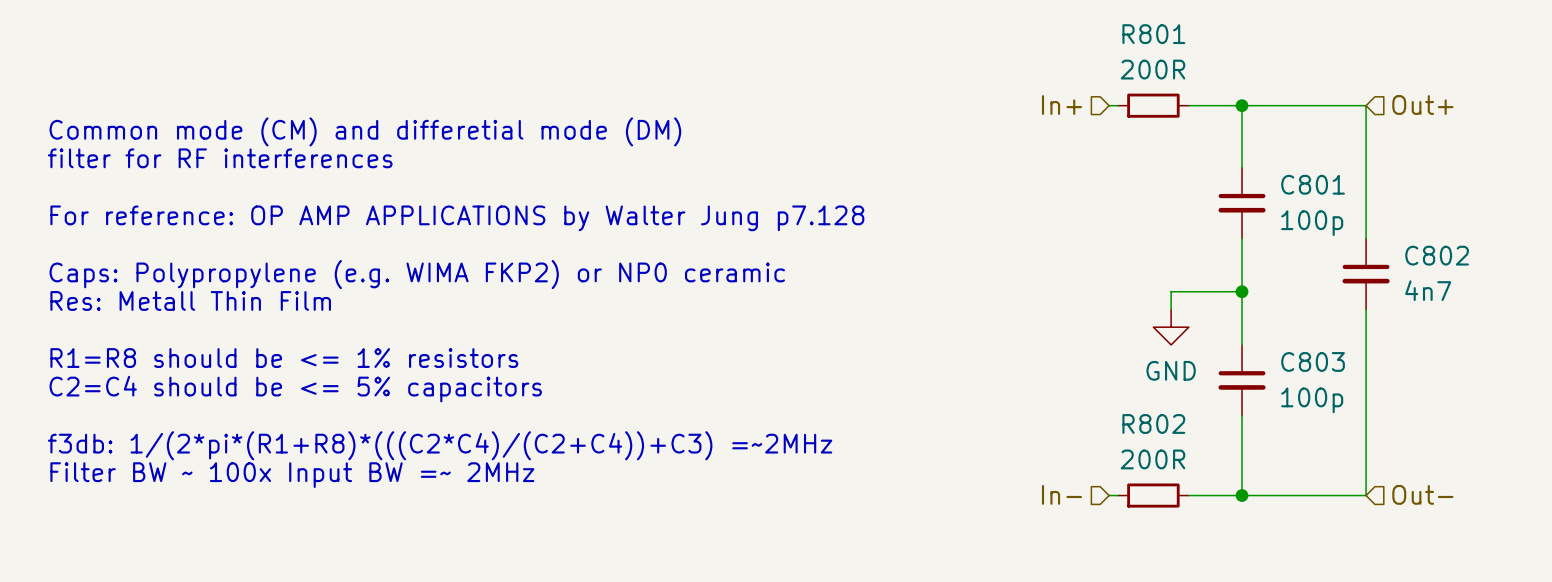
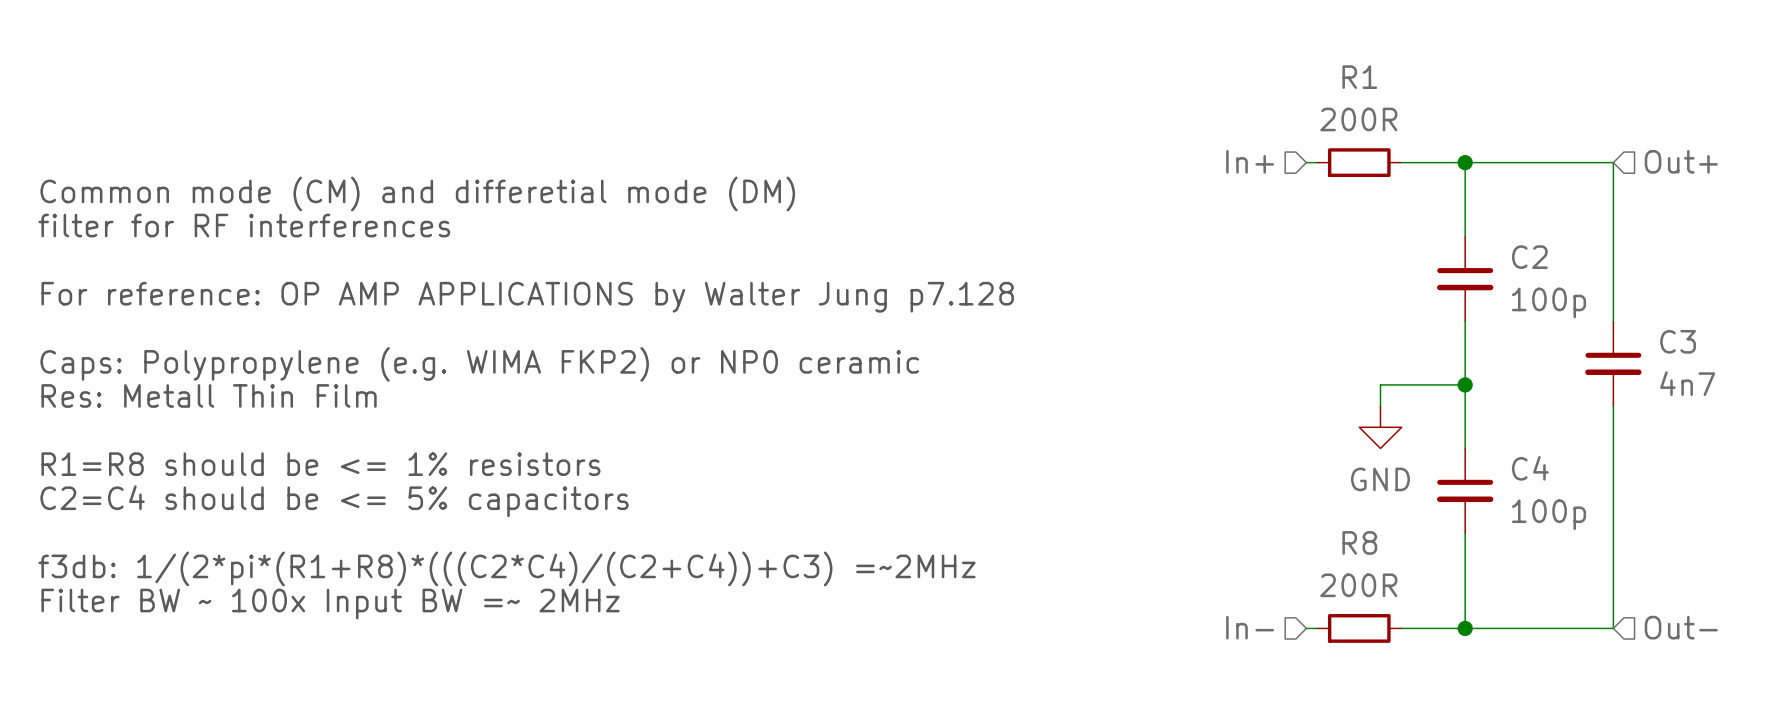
R801 name: R801 (1153, 34) -> R1 (1359, 77)
C801 name: C801 (1313, 184) -> C2 (1529, 257)
C802 name: C802 (1437, 255) -> C3 (1678, 341)
C803 name: C803 (1313, 361) -> C4 (1530, 468)
R802 name: R802 (1153, 423) -> R8 (1359, 542)

